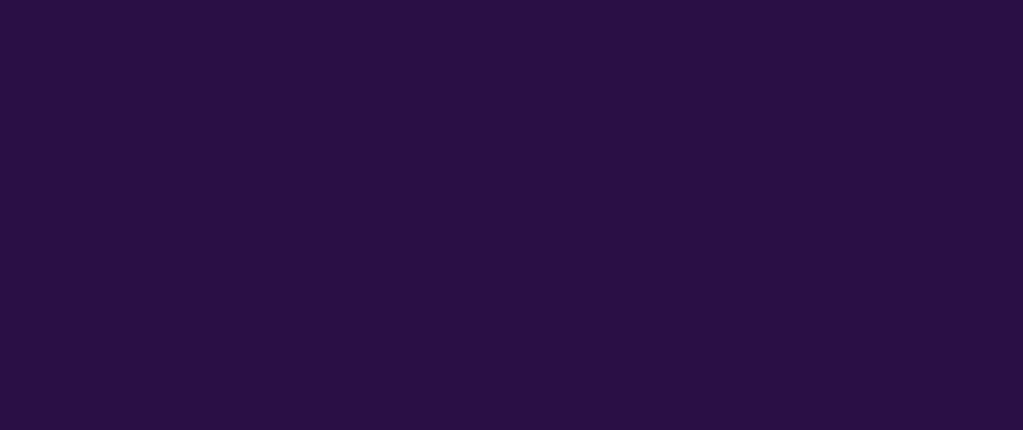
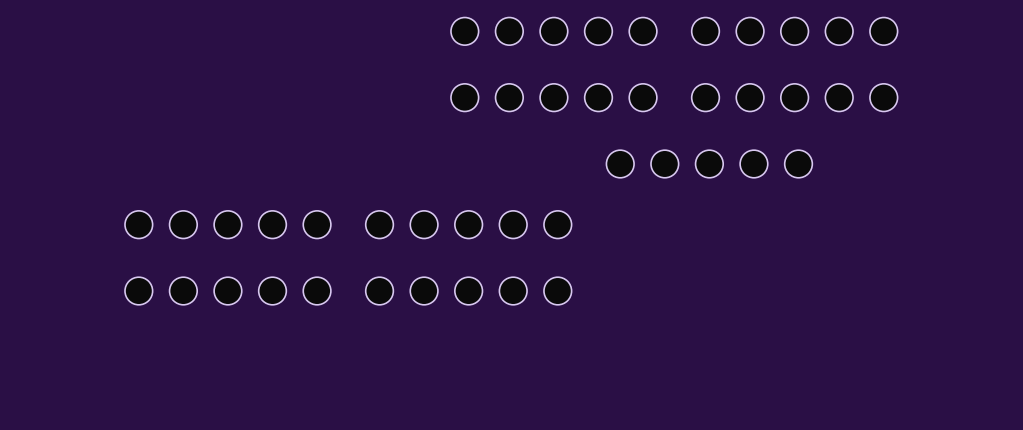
part: none -> (553, 31)
part: none -> (794, 31)
part: none -> (553, 97)
part: none -> (794, 97)
part: none -> (709, 163)
part: none -> (227, 224)
part: none -> (468, 224)
part: none -> (227, 291)
part: none -> (468, 291)

